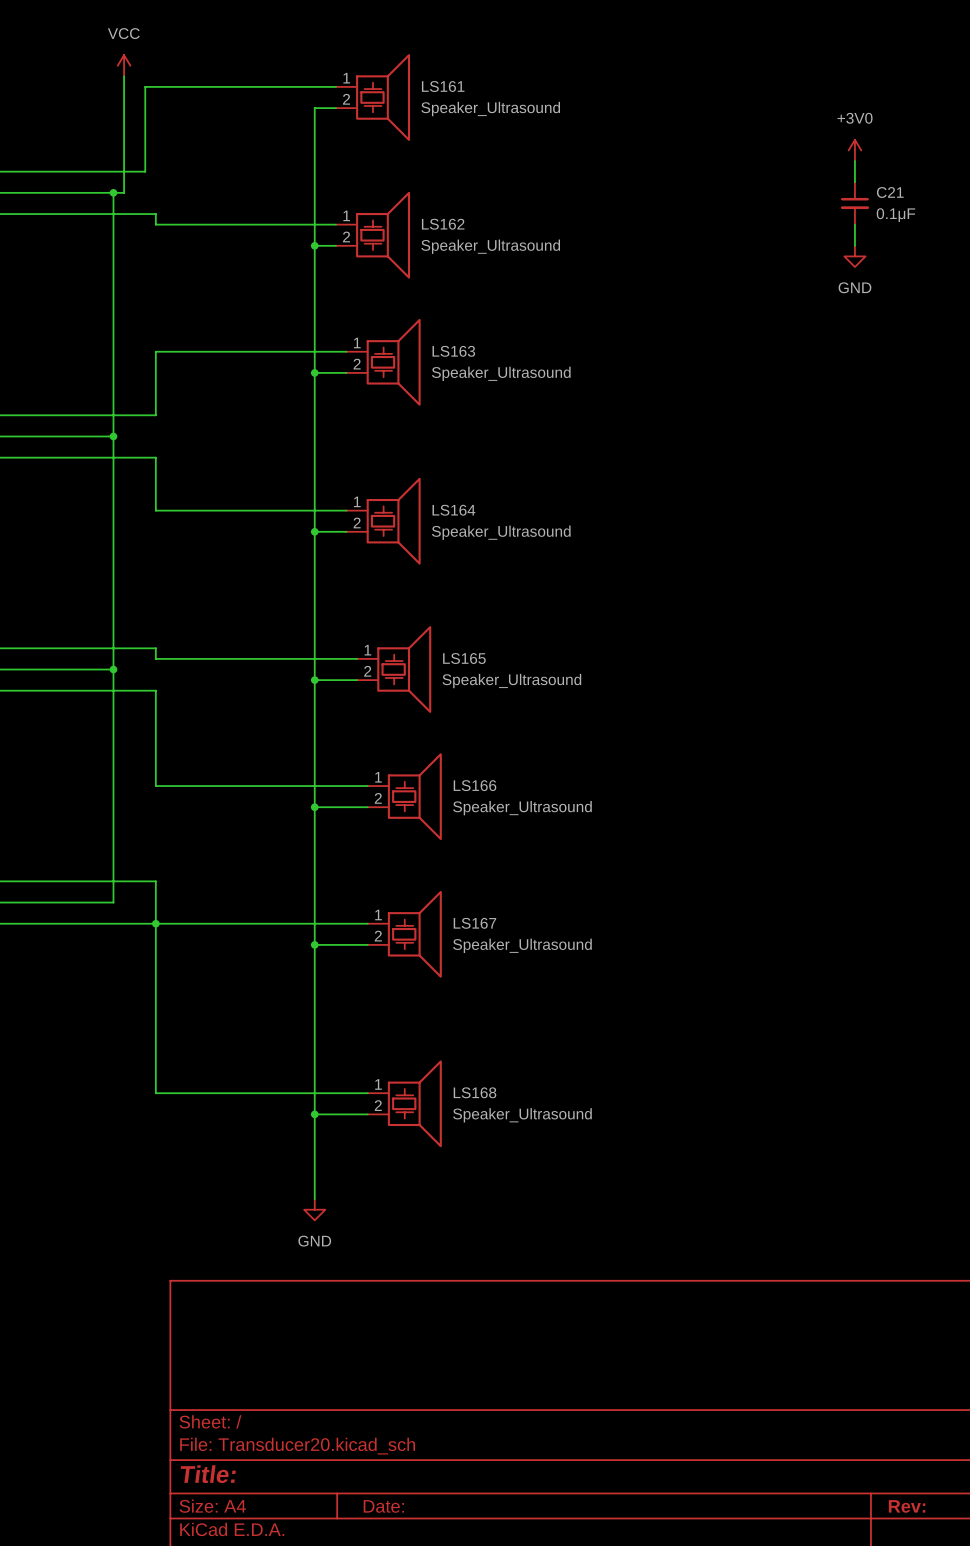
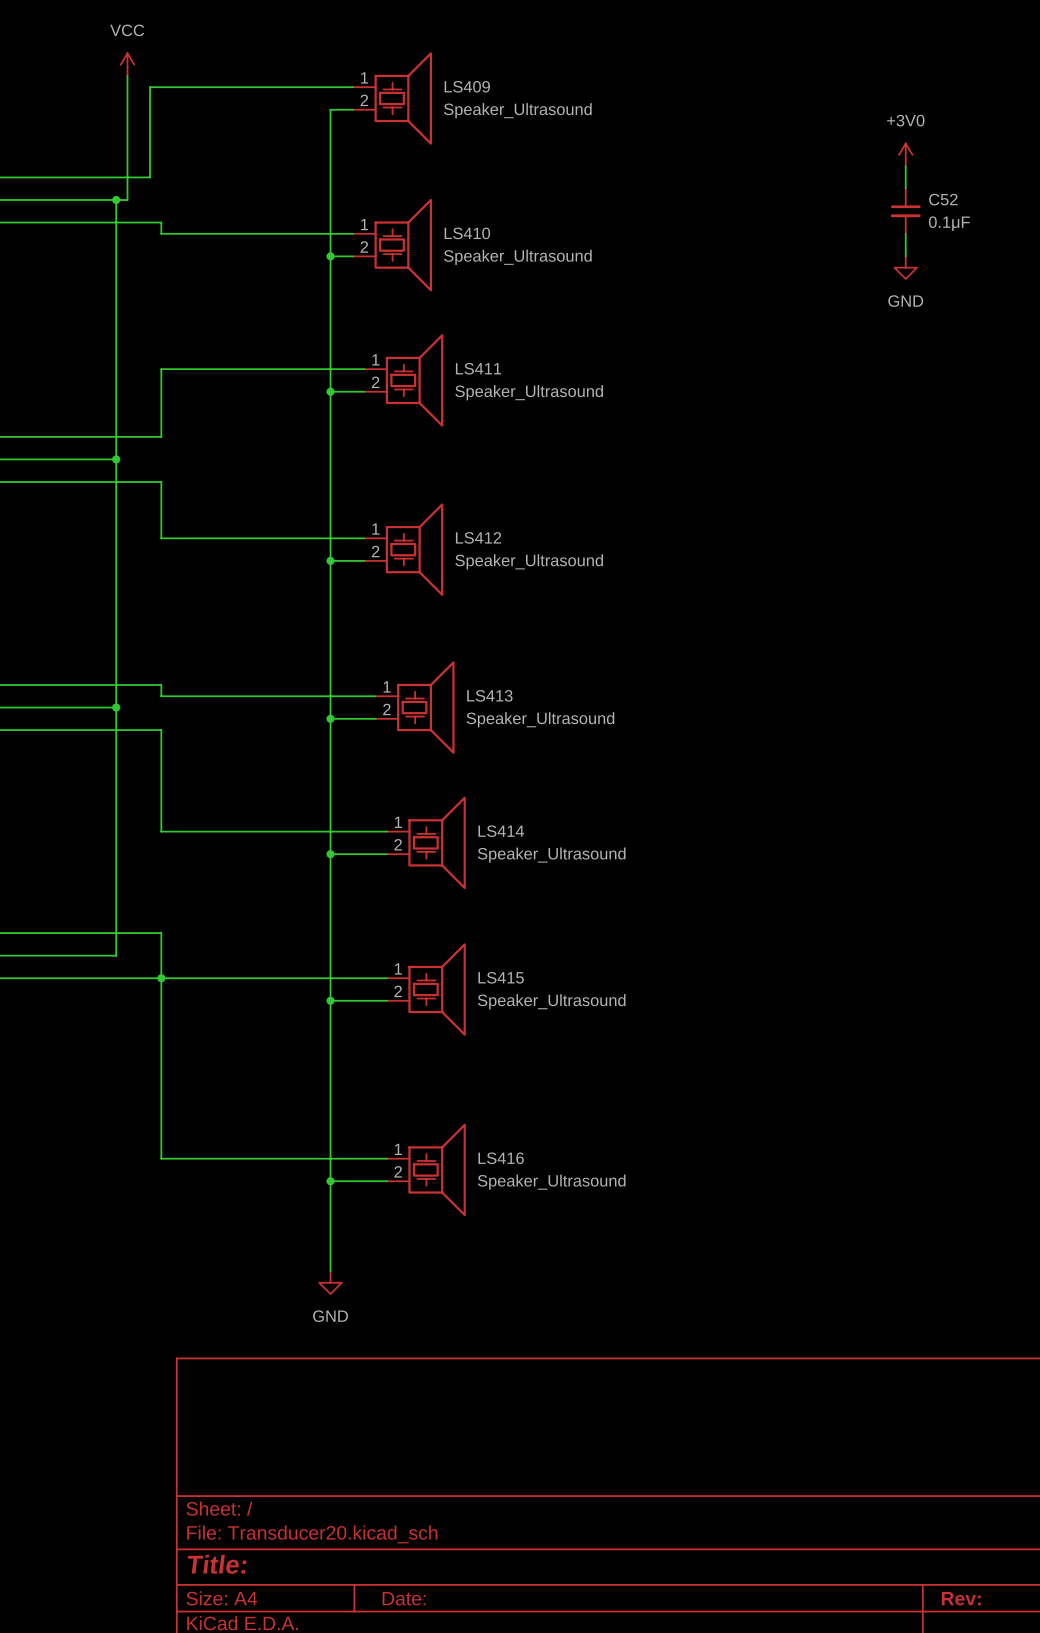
LS161 name: LS161 (443, 86) -> LS409 (467, 86)
C21 name: C21 (890, 192) -> C52 (943, 199)
LS162 name: LS162 (443, 224) -> LS410 (467, 233)
LS163 name: LS163 (453, 351) -> LS411 (478, 368)
LS164 name: LS164 (453, 510) -> LS412 (478, 537)
LS165 name: LS165 (464, 658) -> LS413 (489, 695)
LS166 name: LS166 (474, 785) -> LS414 (501, 831)
LS167 name: LS167 (474, 923) -> LS415 (501, 977)
LS168 name: LS168 (475, 1092) -> LS416 (501, 1158)

